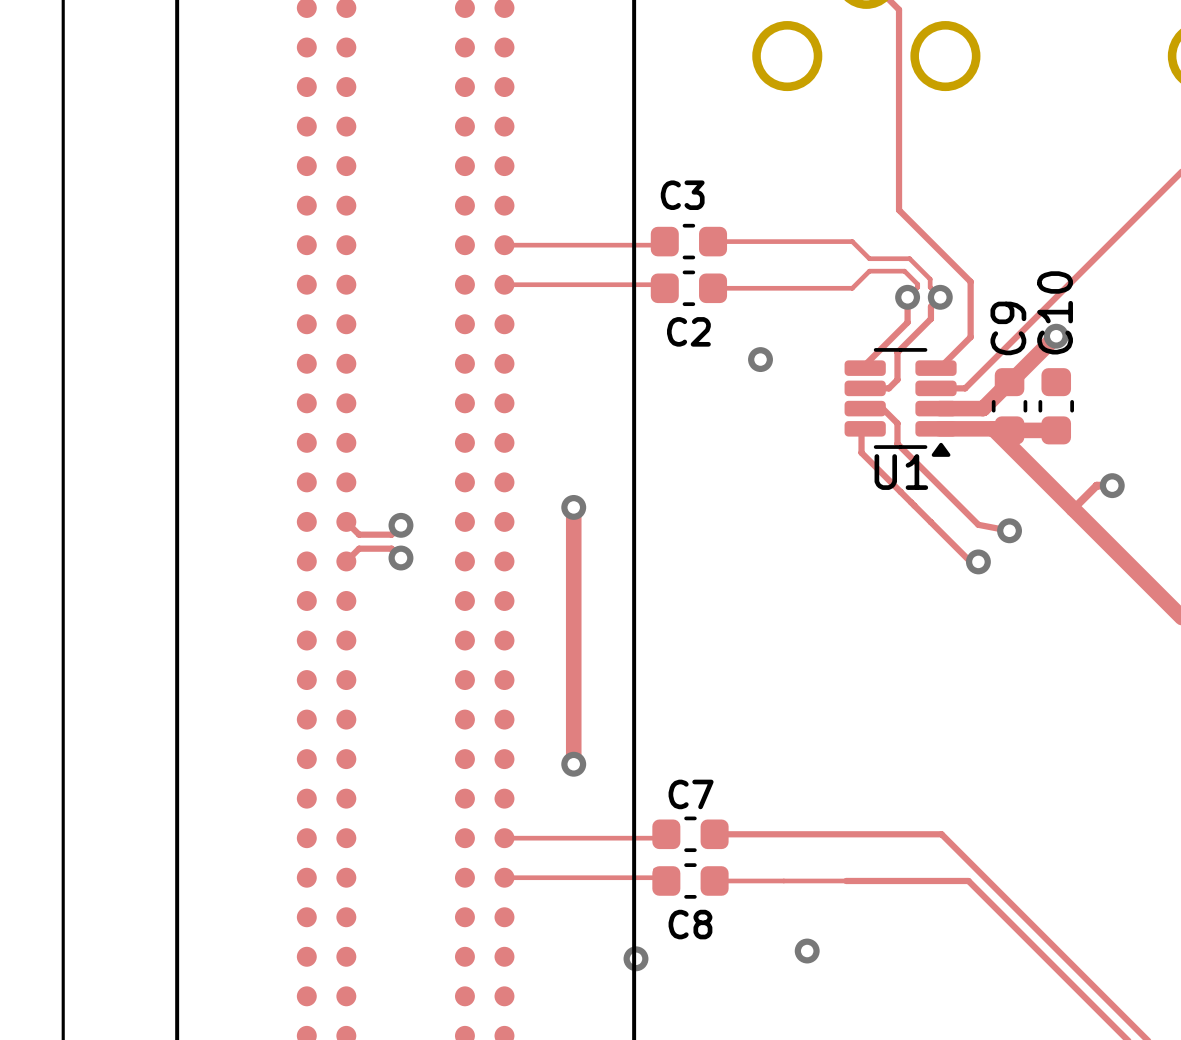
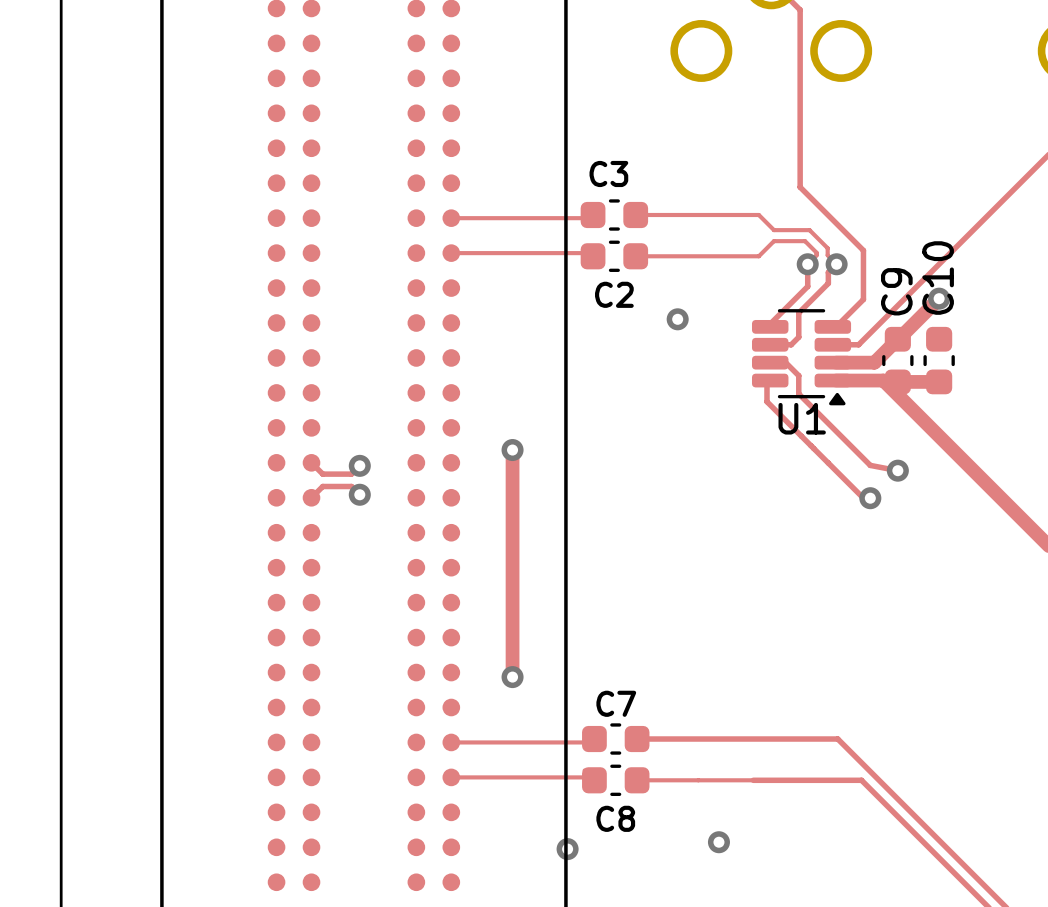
track: (1112, 485) (1096, 485) (1073, 508) -> none
via: (1112, 485) -> none

